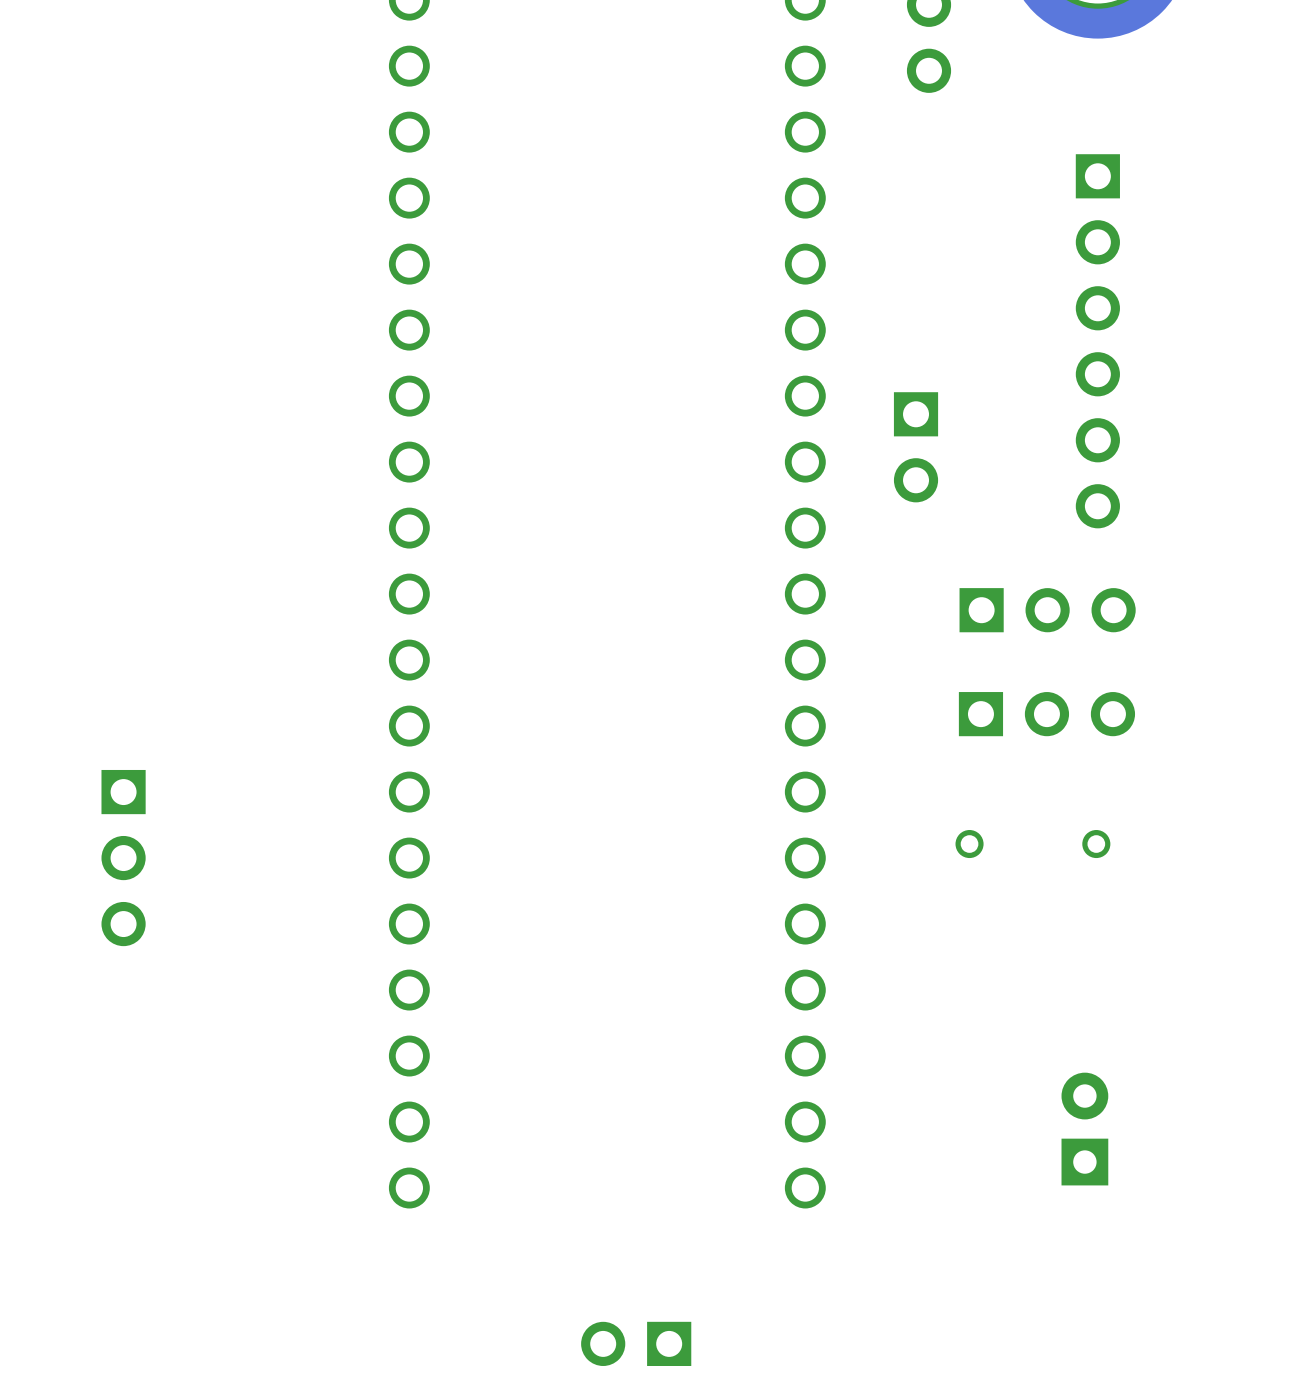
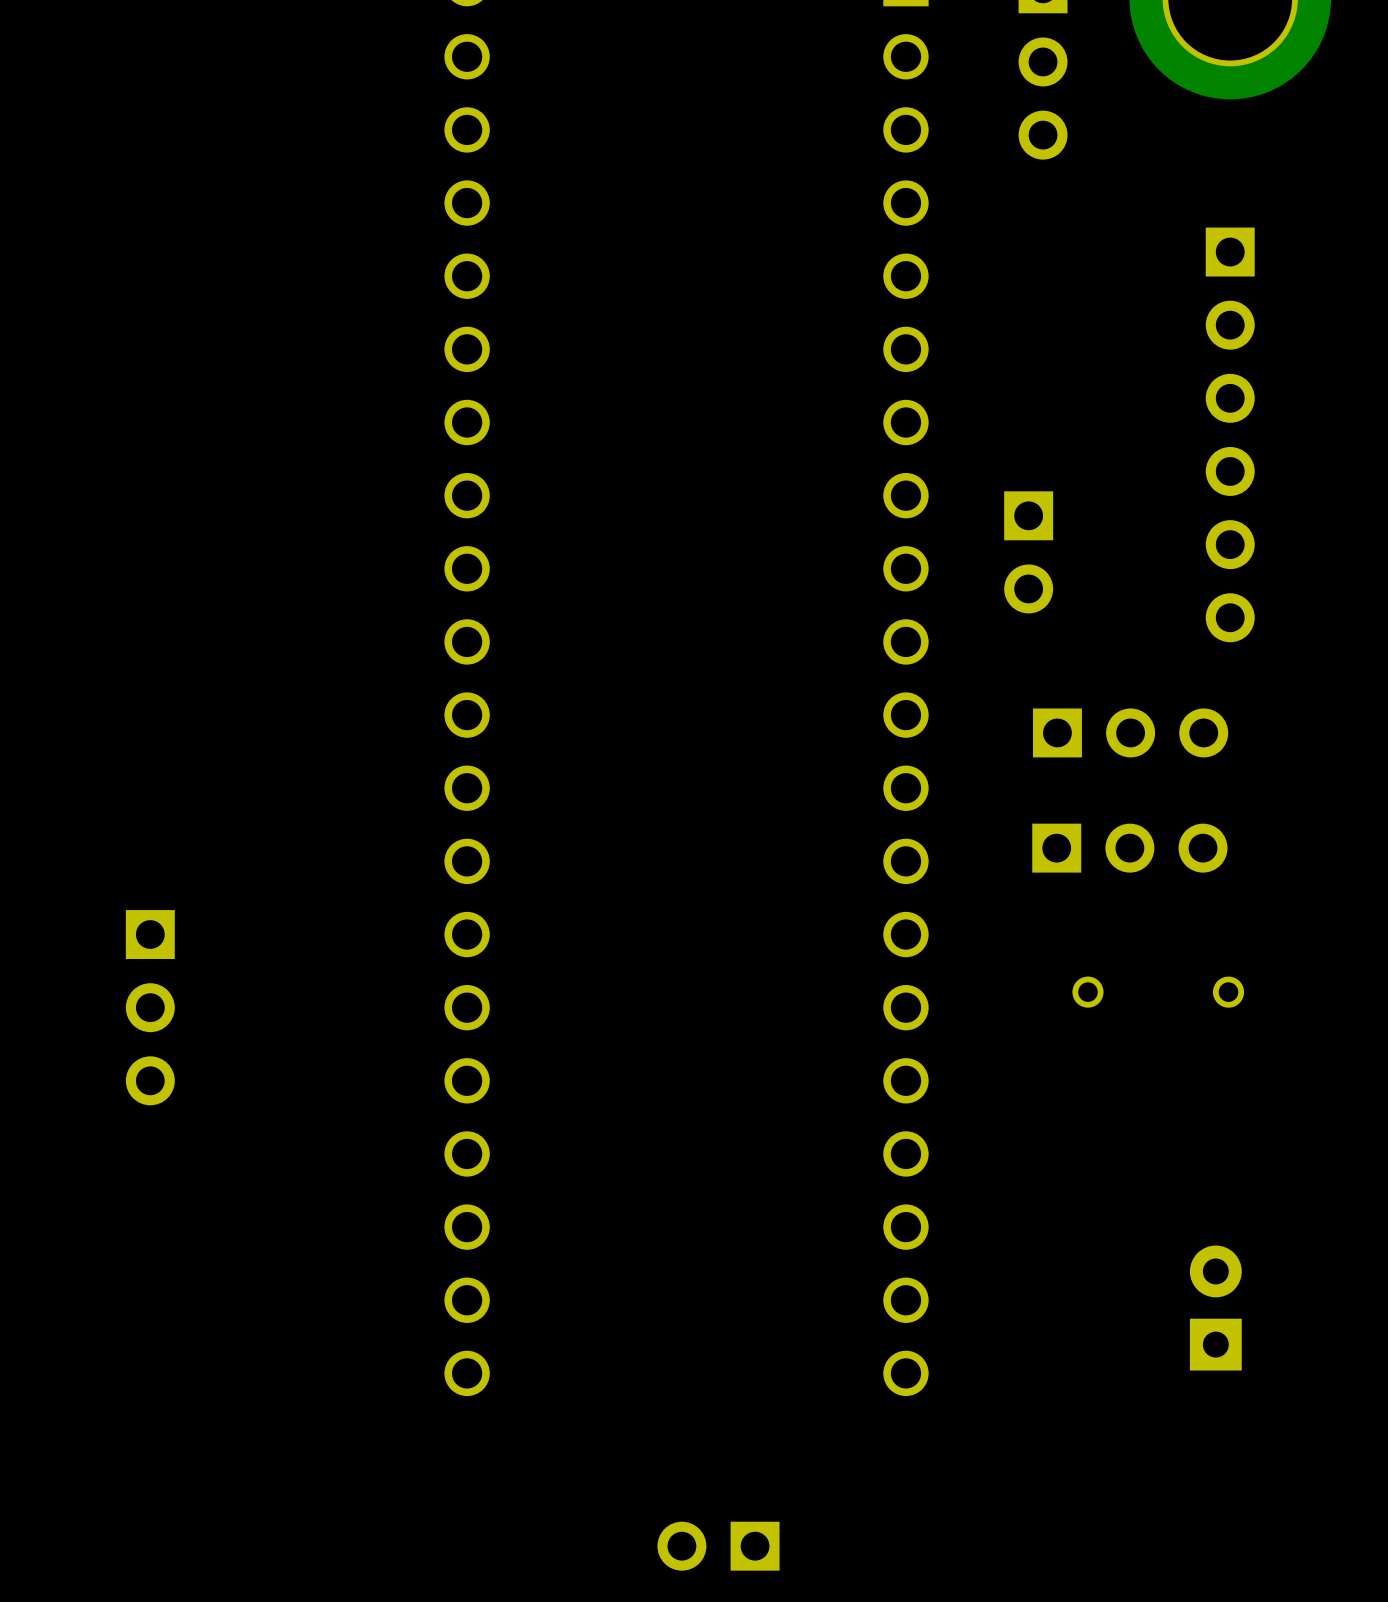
part position: (1047, 610) -> (1130, 732)
part position: (1046, 714) -> (1129, 848)

